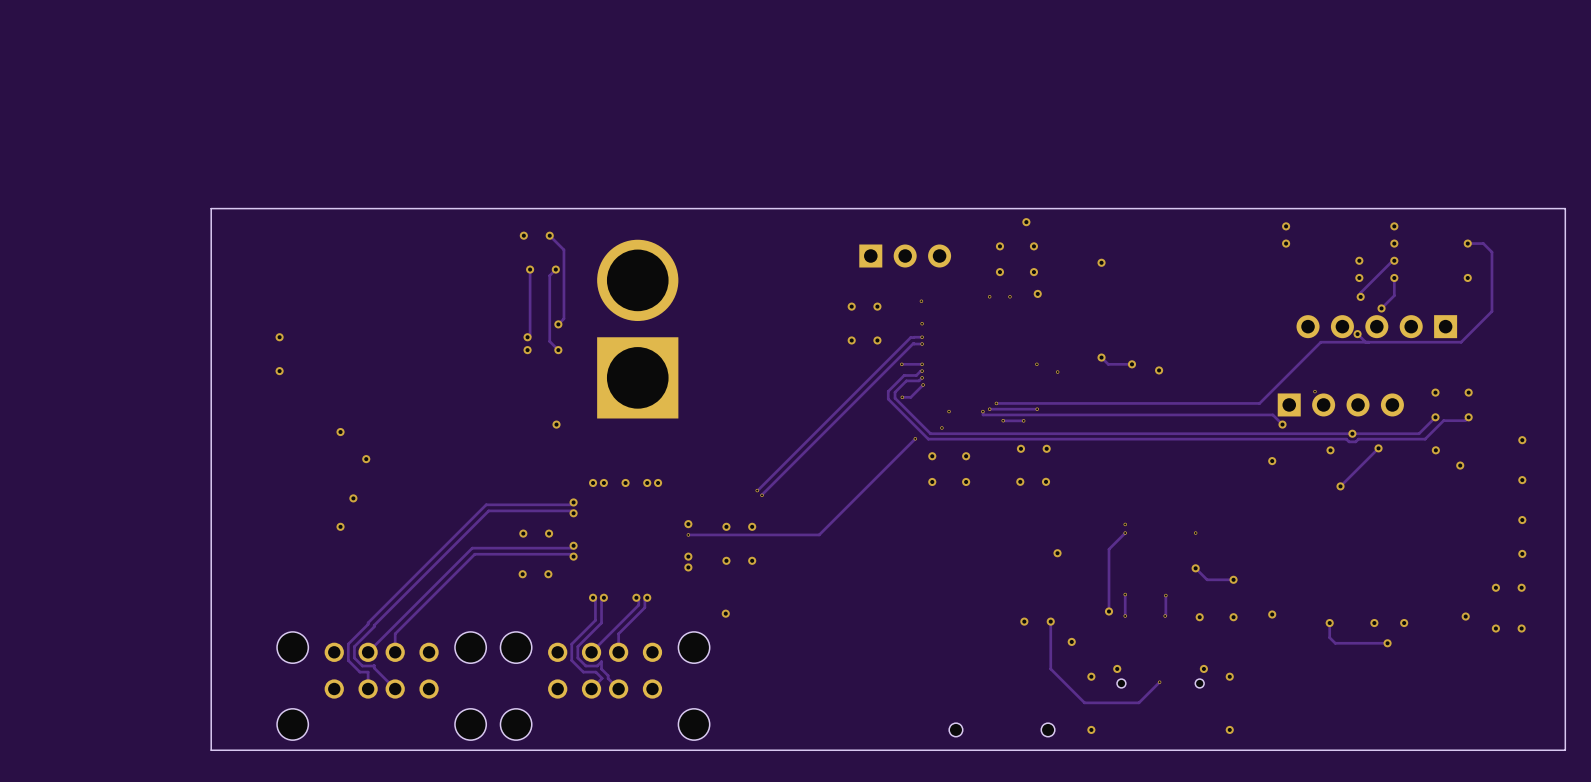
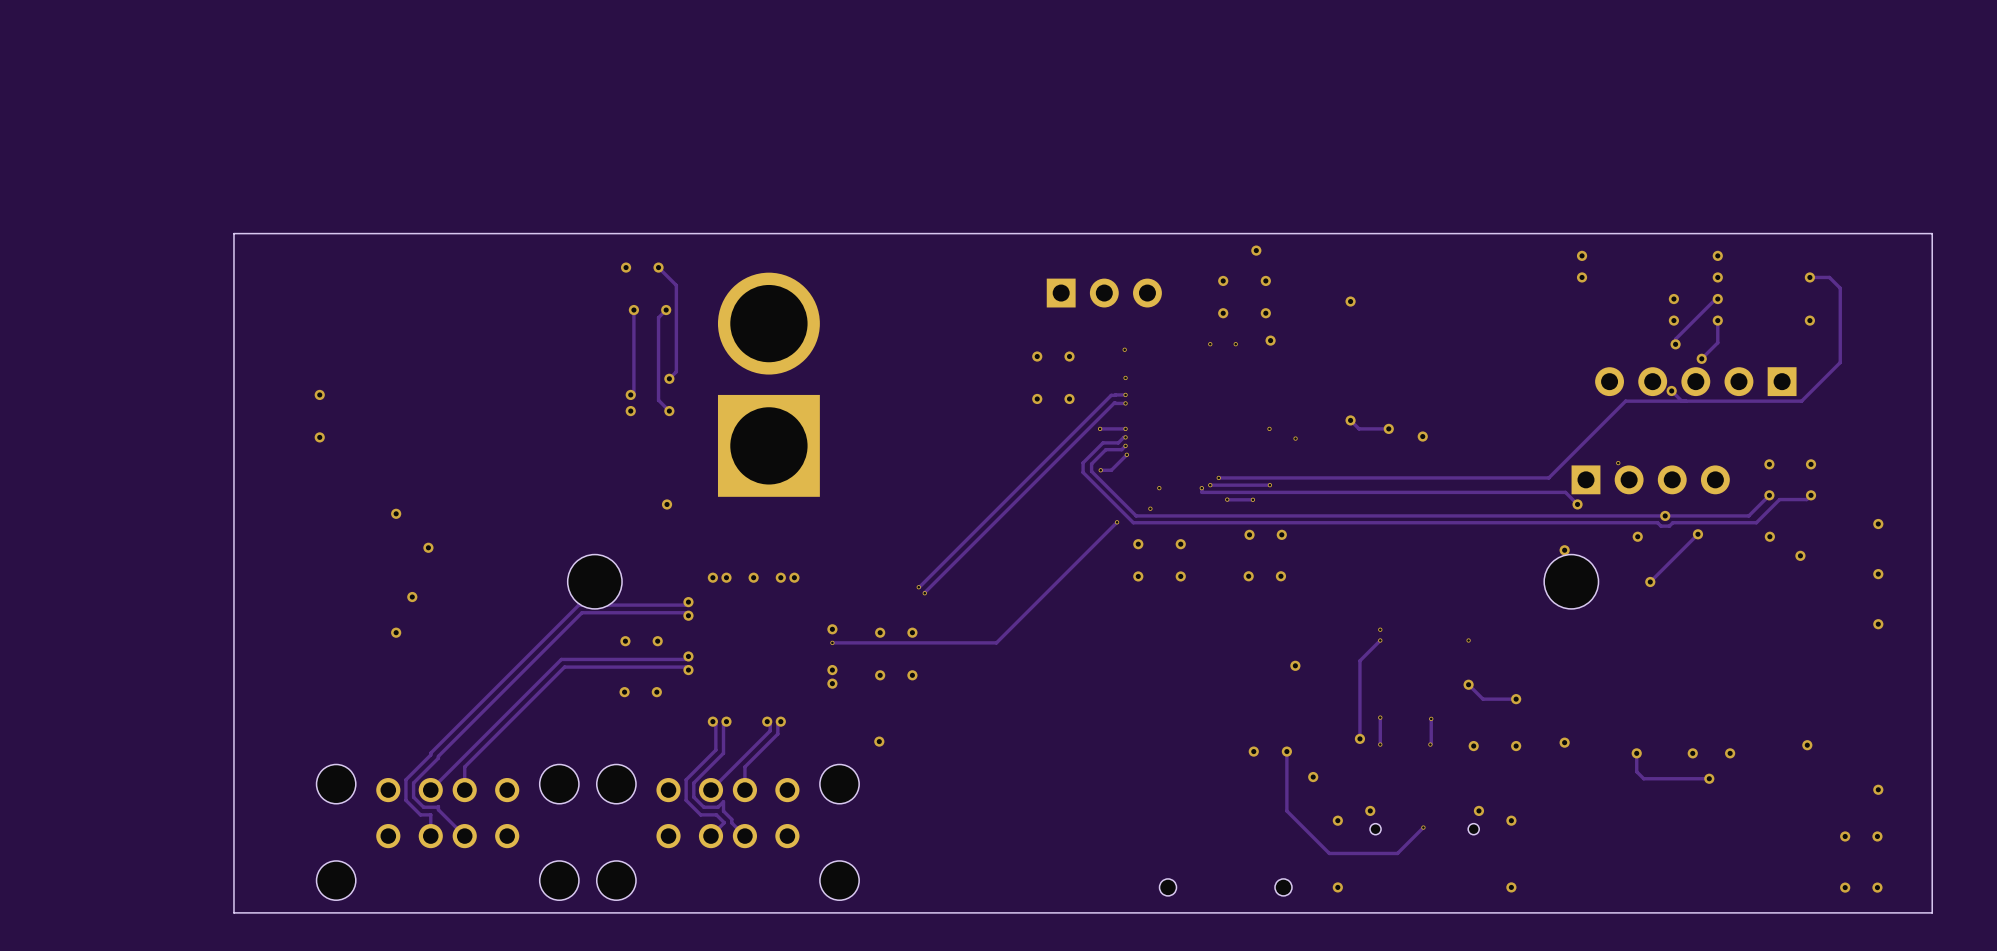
part: none -> (594, 581)
part: none -> (1571, 581)
via: (1522, 553) -> none
via: (1495, 587) -> none
via: (1521, 587) -> none
via: (1495, 628) -> none
via: (1521, 628) -> none
via: none -> (1878, 789)
via: none -> (1845, 836)
via: none -> (1877, 836)
via: none -> (1845, 887)
via: none -> (1877, 887)

